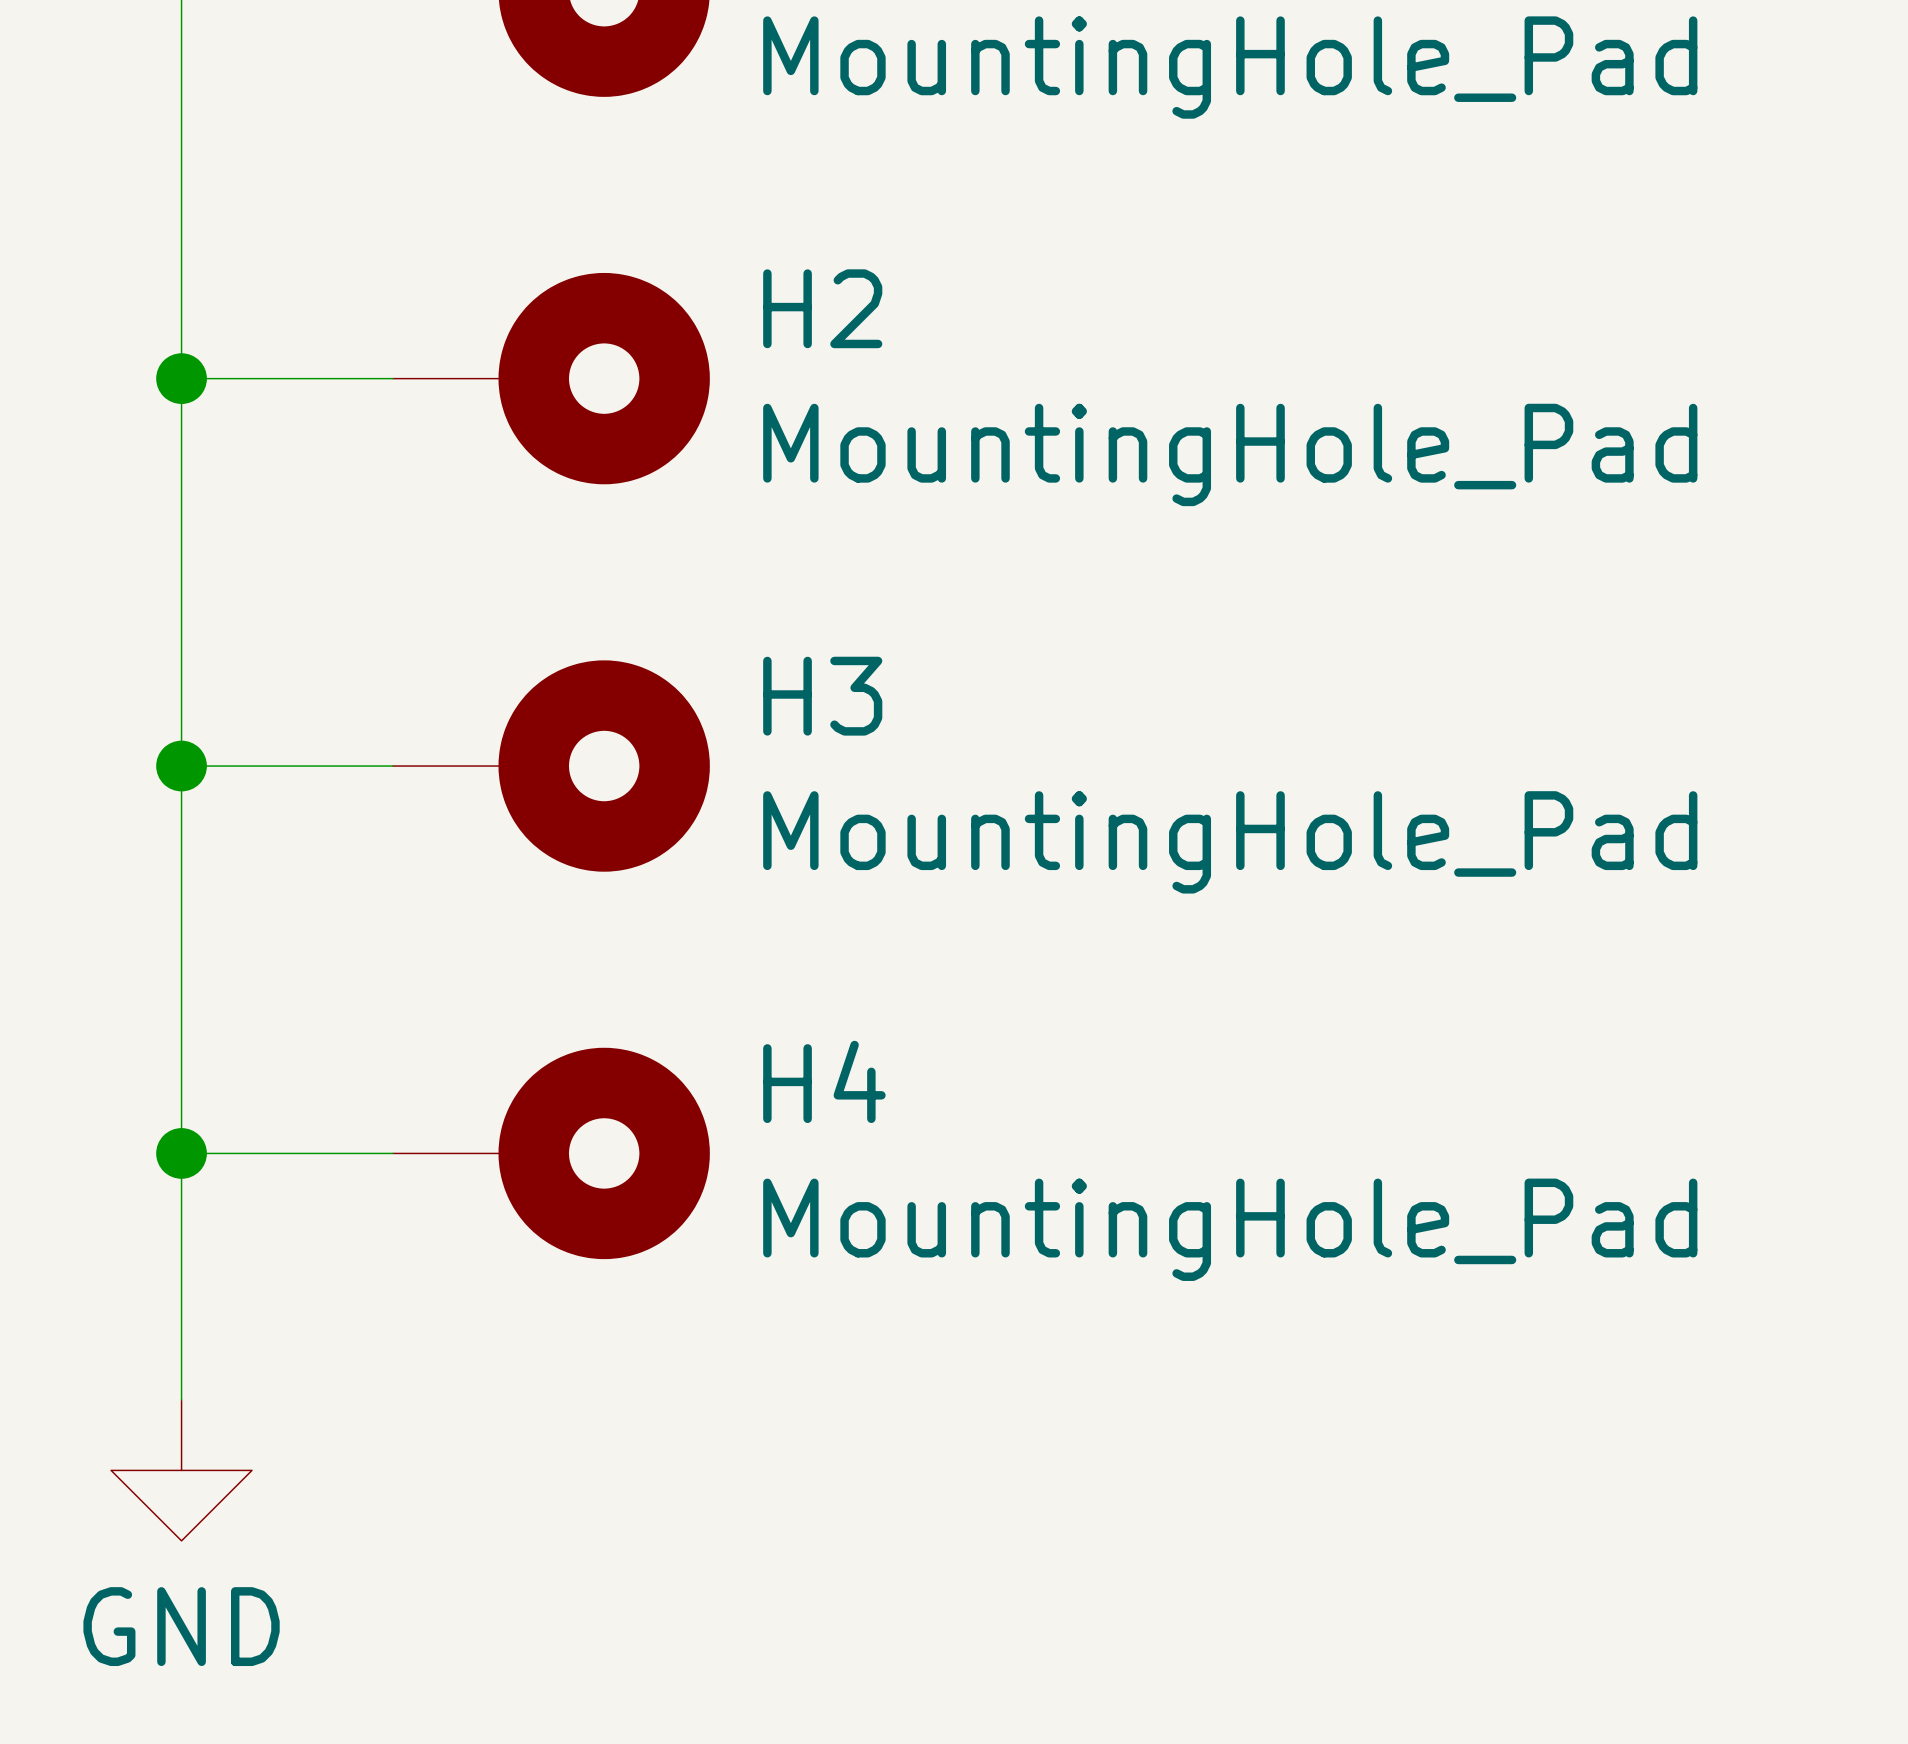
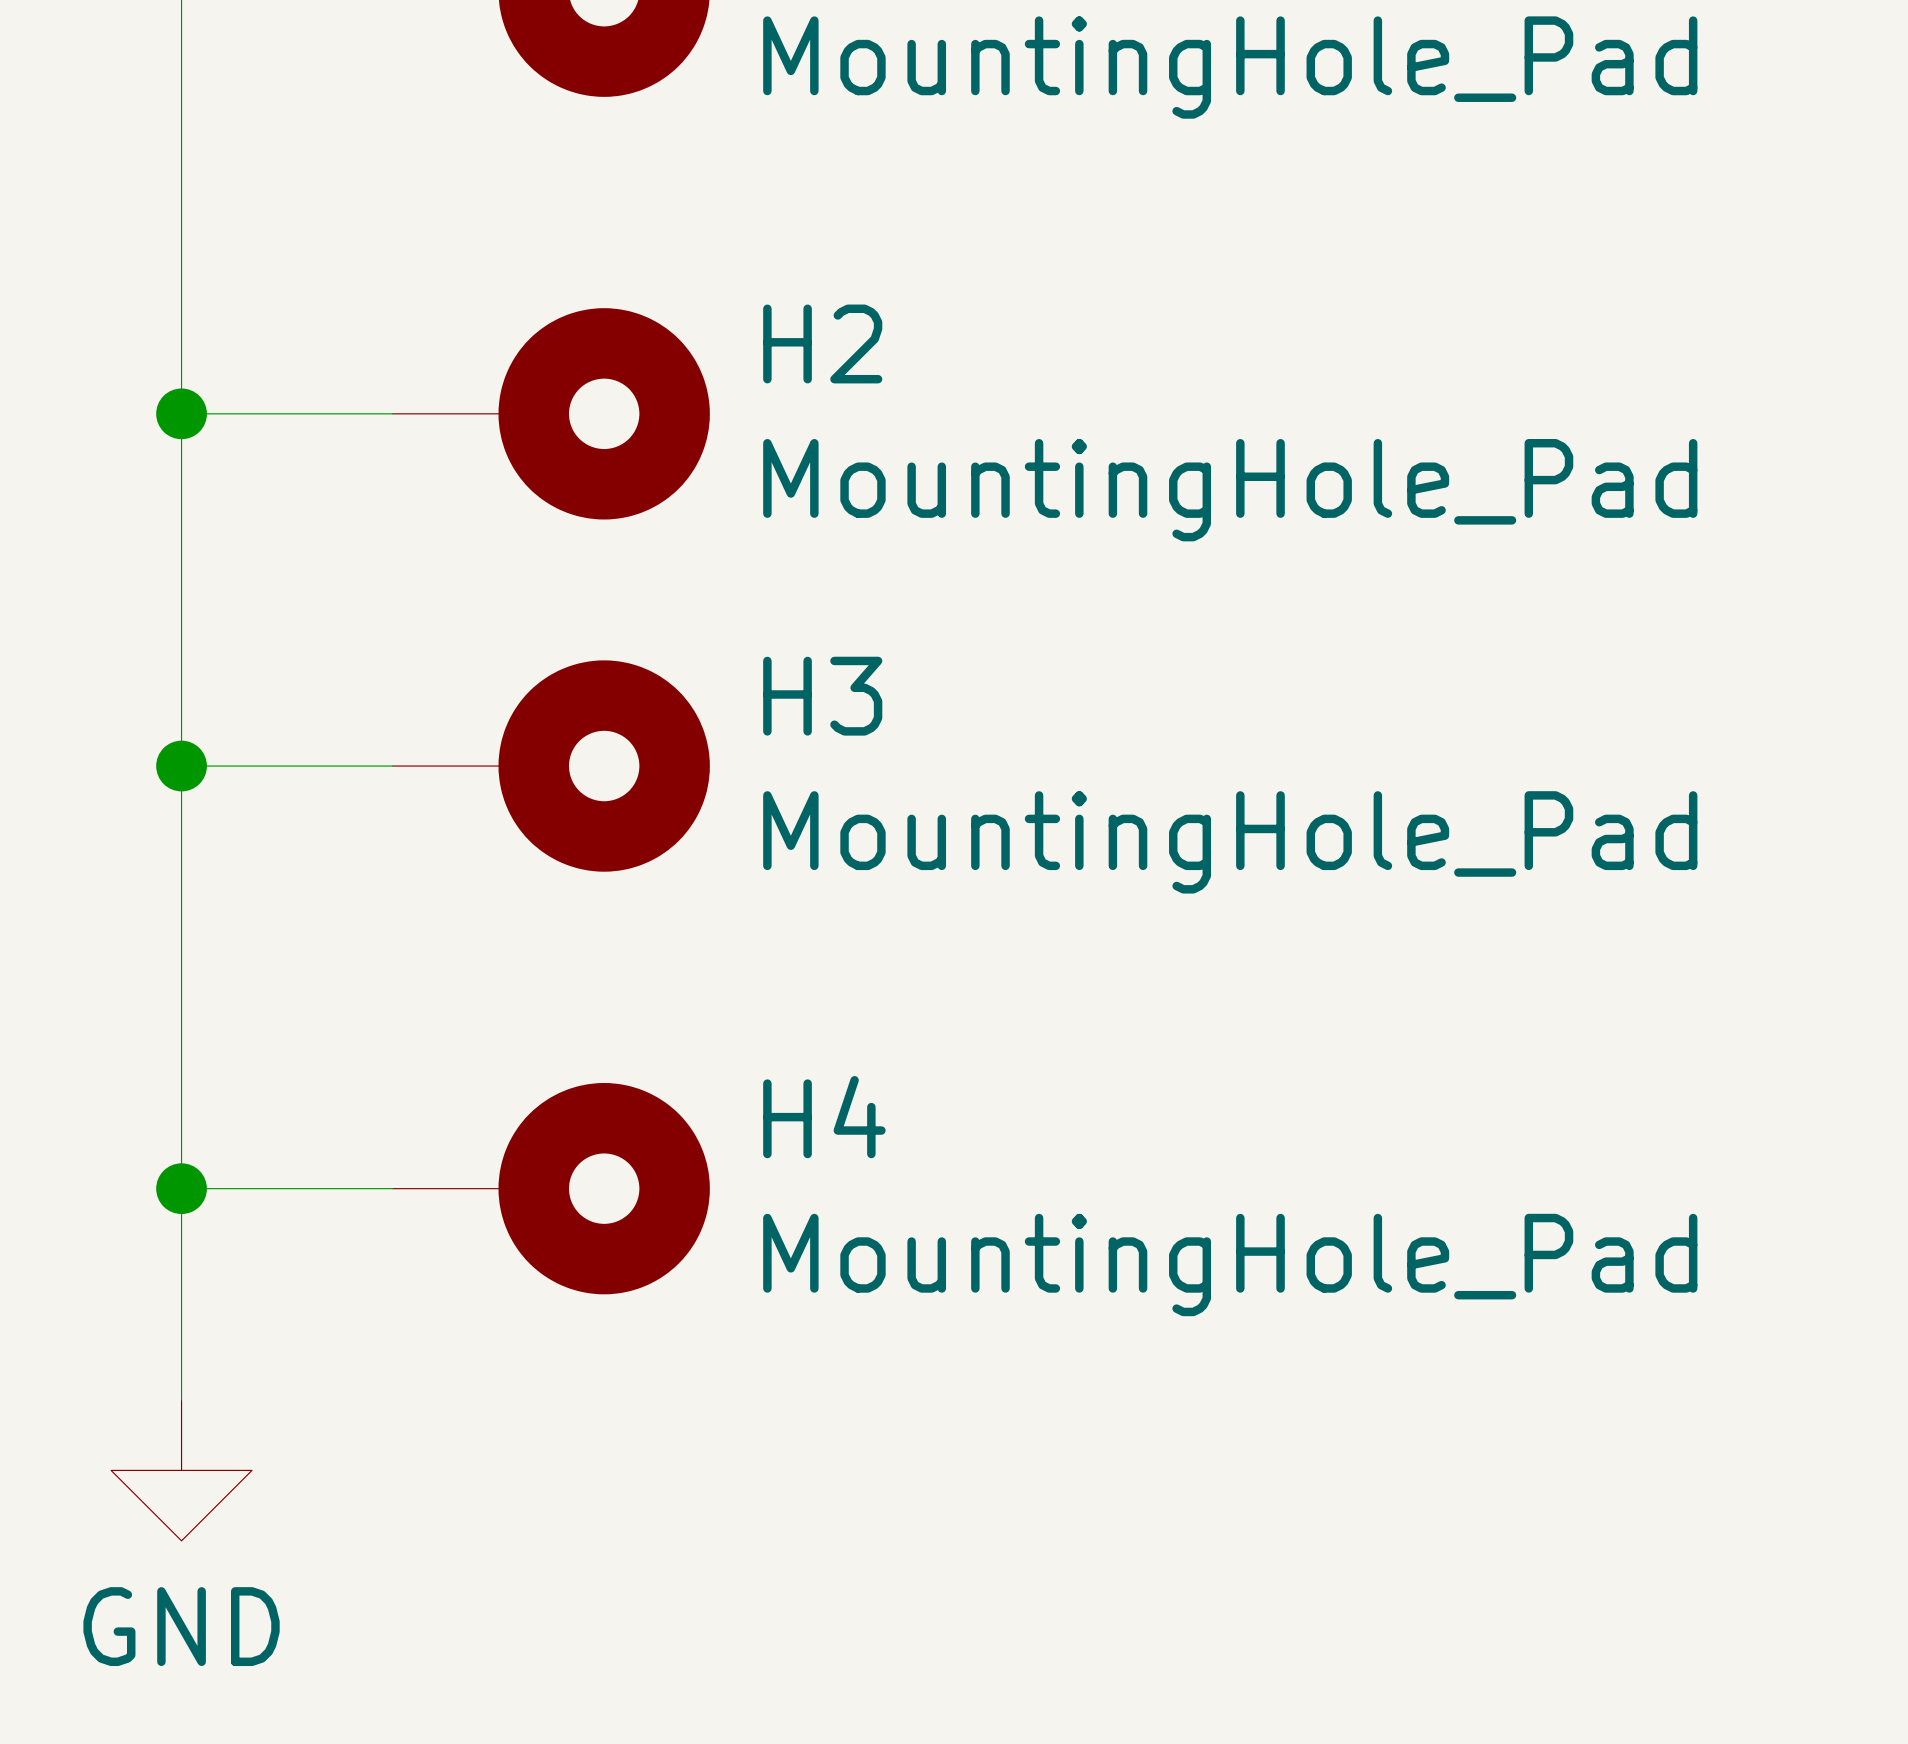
wire: (181, 378) (392, 378) -> (181, 413) (392, 413)
junction position: (181, 378) -> (181, 413)
H2 position: (551, 378) -> (551, 413)
wire: (181, 1153) (392, 1153) -> (181, 1188) (392, 1188)
junction position: (181, 1153) -> (181, 1188)
H4 position: (551, 1153) -> (551, 1188)

